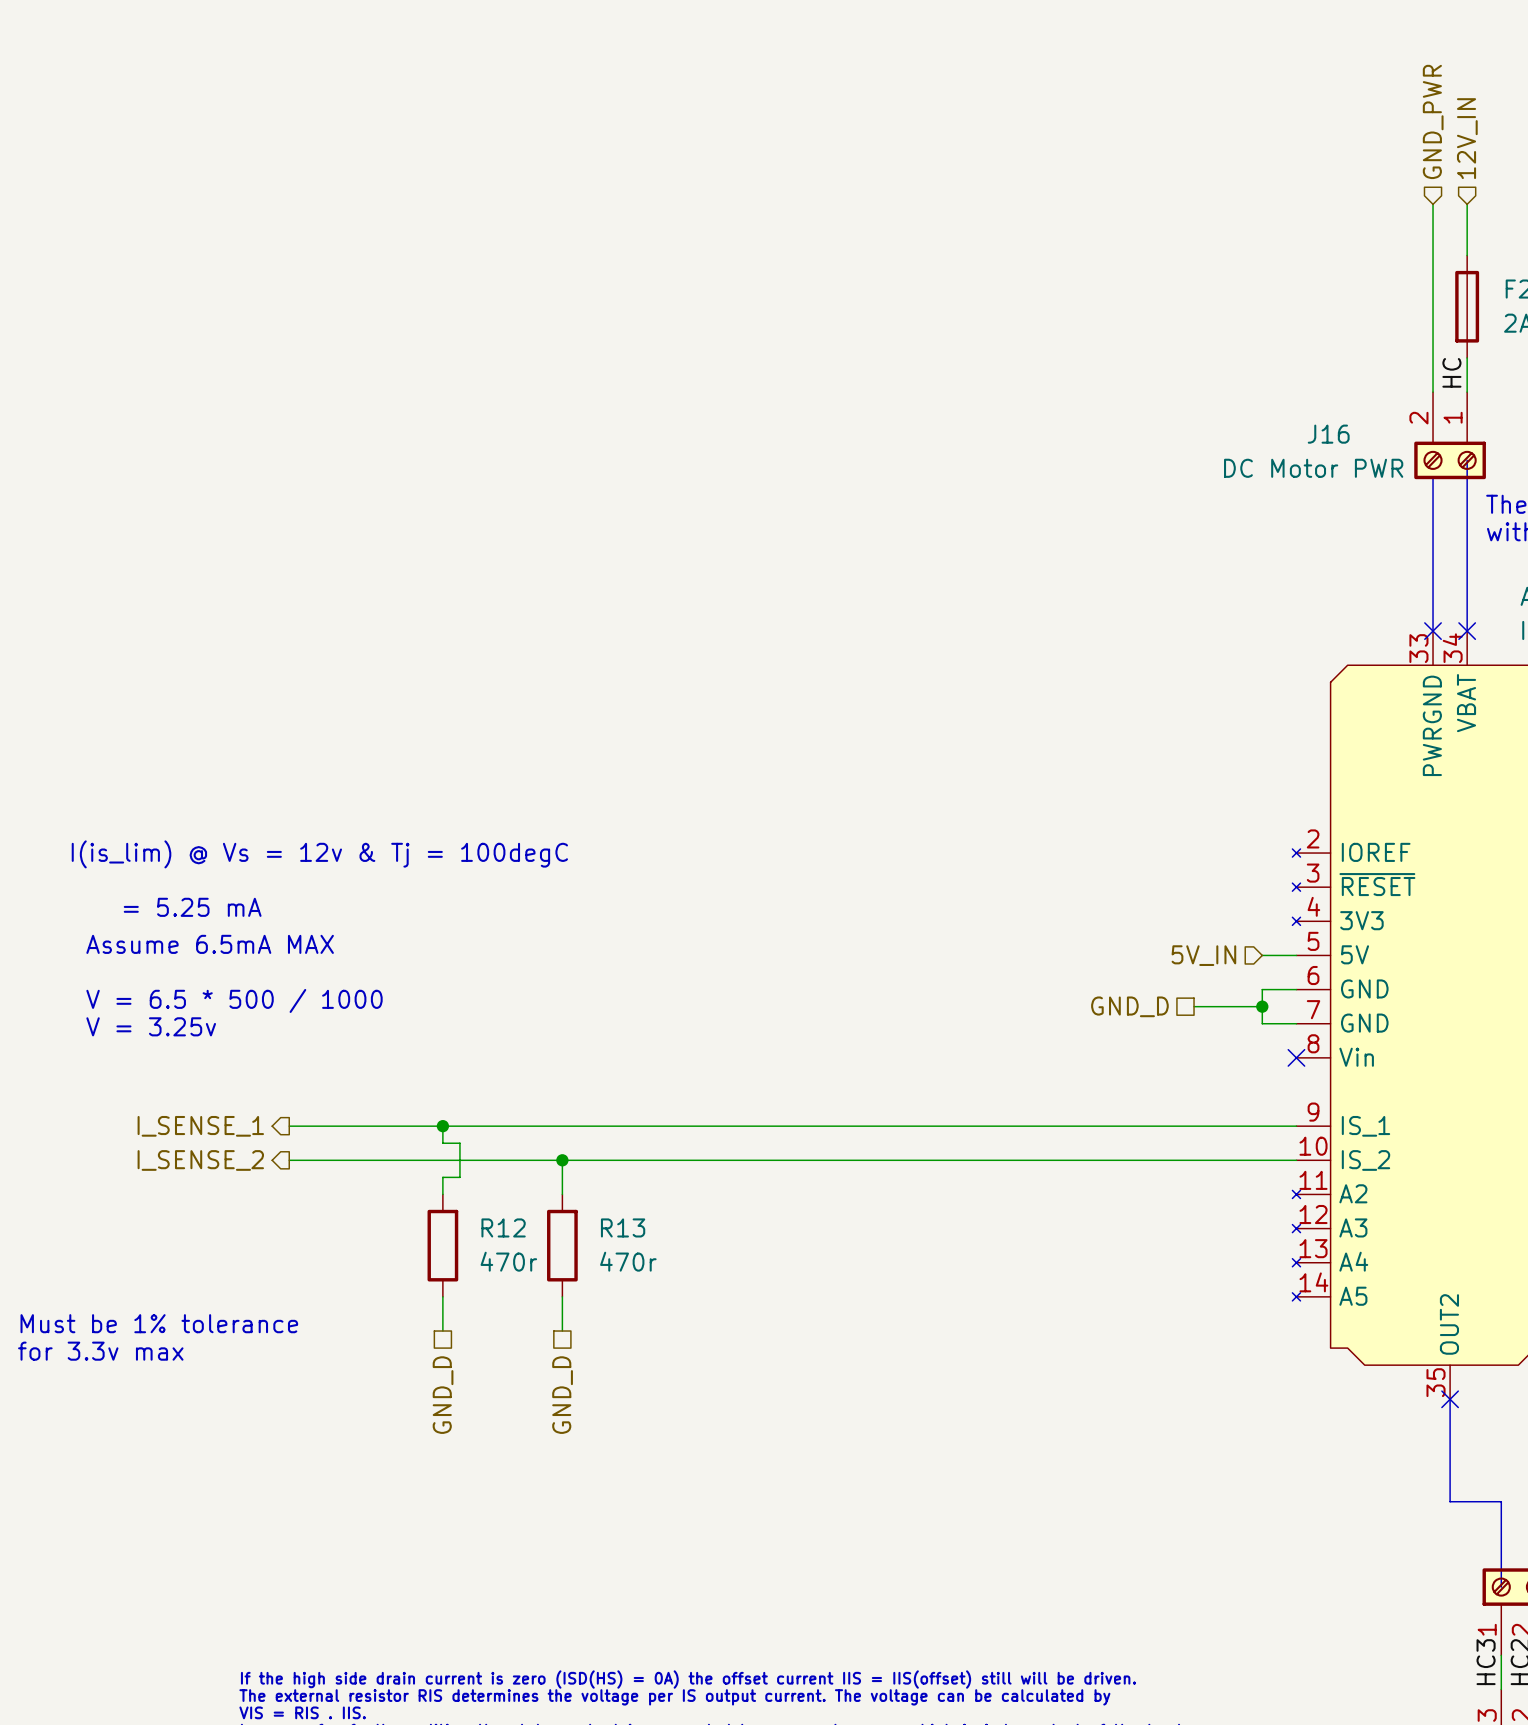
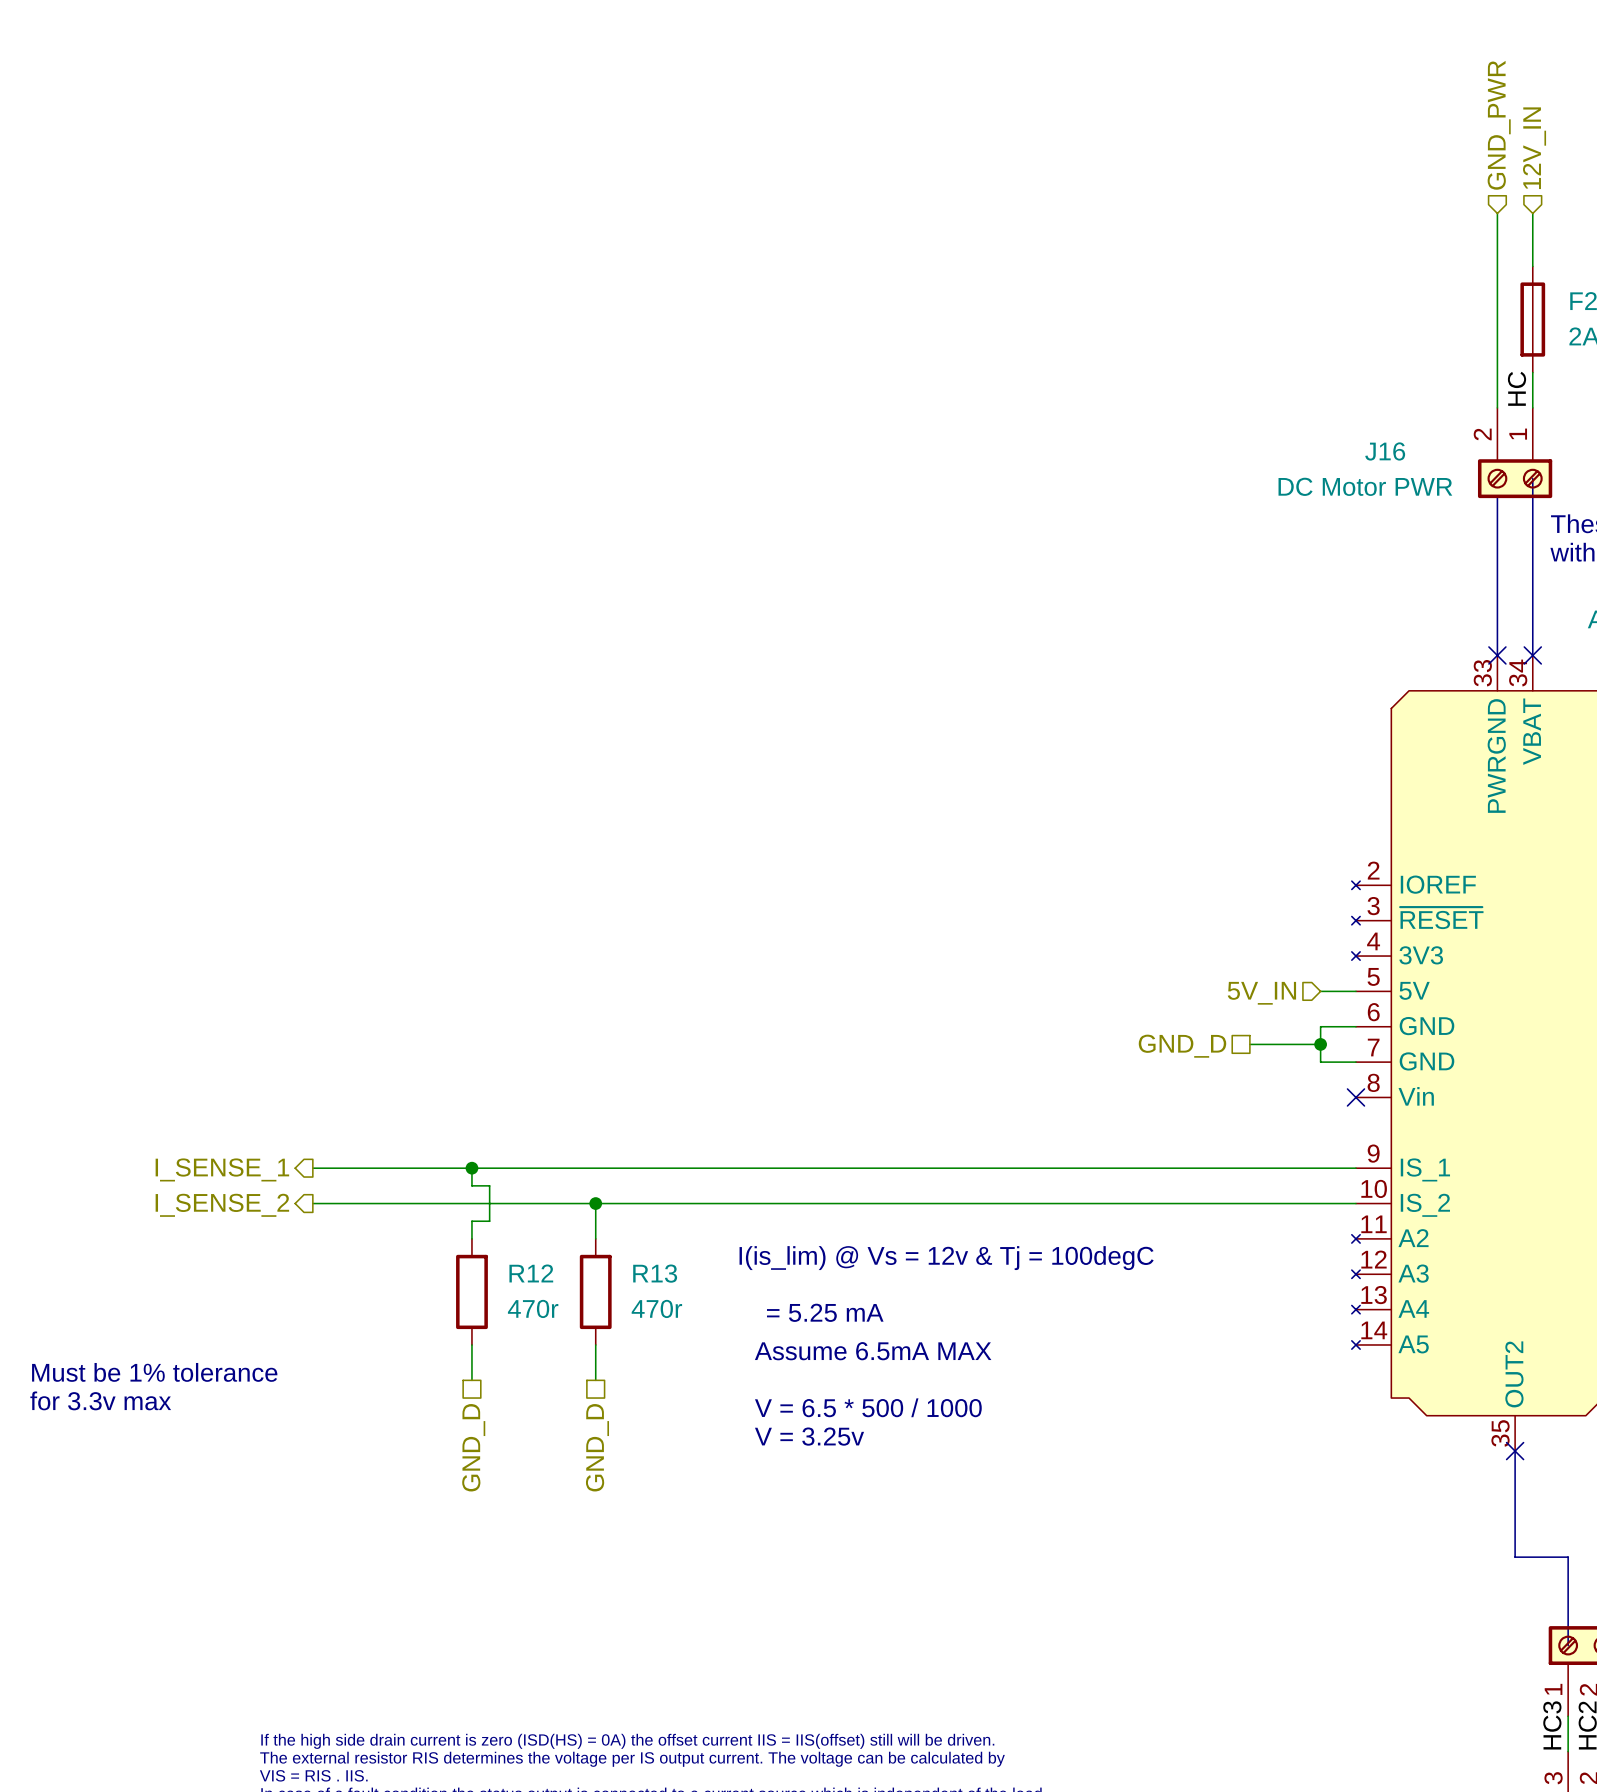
text: I(is_lim) @ Vs = 12v & Tj = 100degC (319, 854) -> none
text: = 5.25 mA (192, 907) -> none
text: Assume 6.5mA MAX (210, 944) -> none
text: V = 6.5 * 500 / 1000 (234, 1000) -> none
text: V = 3.25v (151, 1026) -> none
text: none -> I(is_lim) @ Vs = 12v & Tj = 100degC (946, 1258)
text: none -> = 5.25 mA (825, 1312)
text: none -> Assume 6.5mA MAX (873, 1351)
text: none -> V = 6.5 * 500 / 1000 (868, 1407)
text: none -> V = 3.25v (809, 1436)

